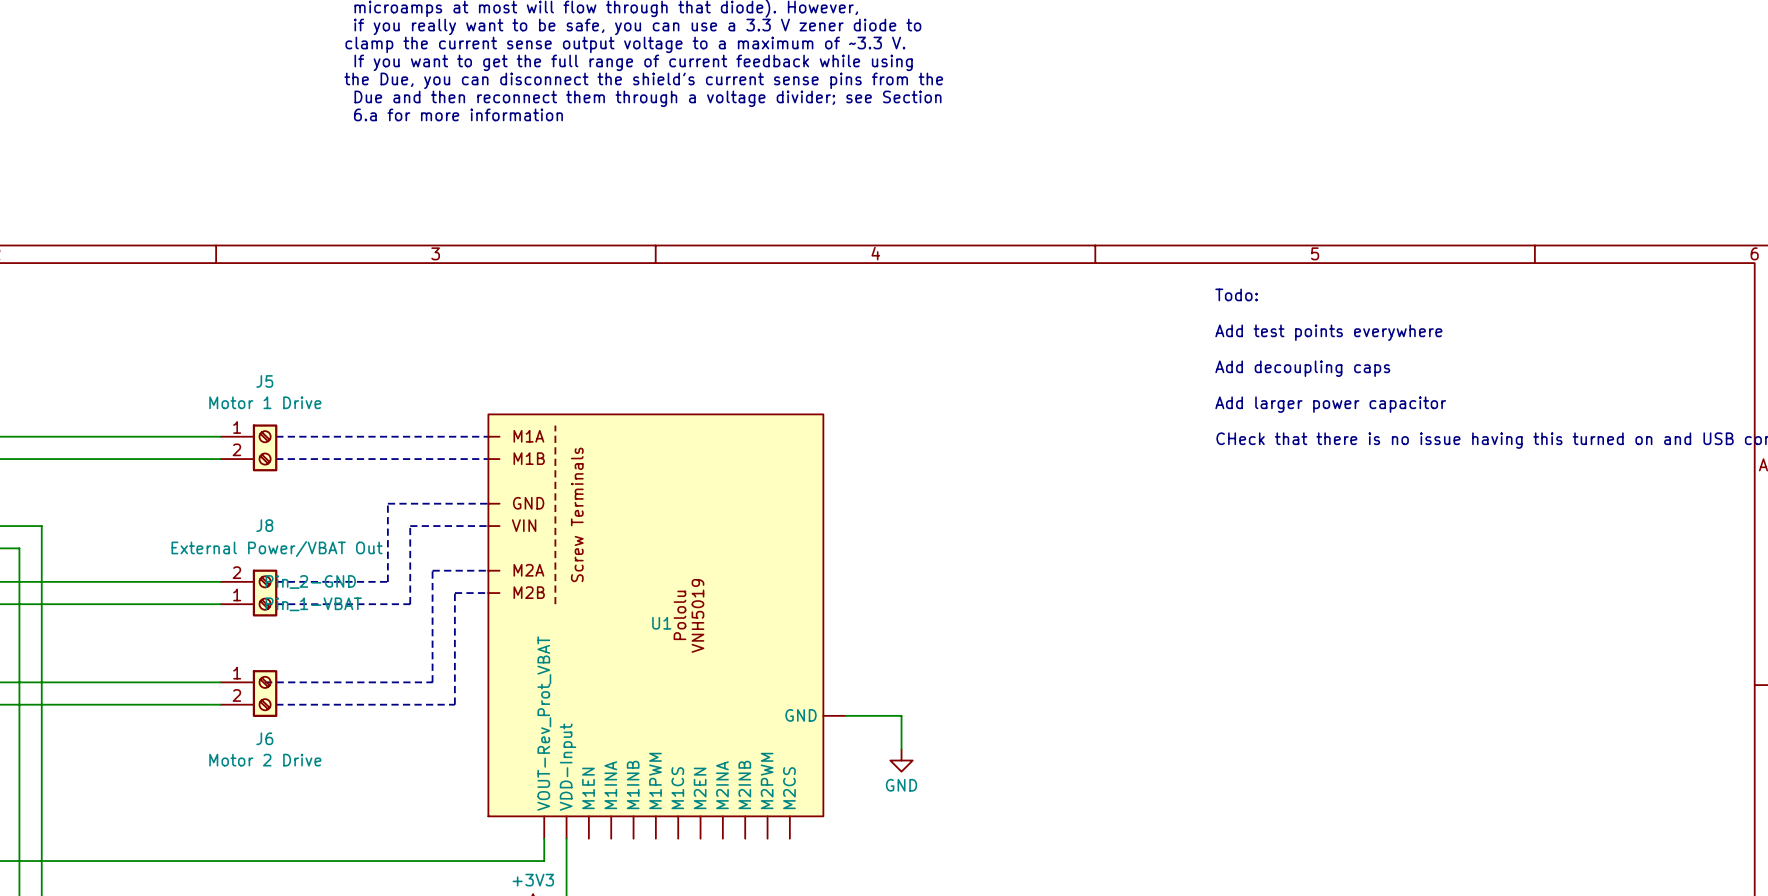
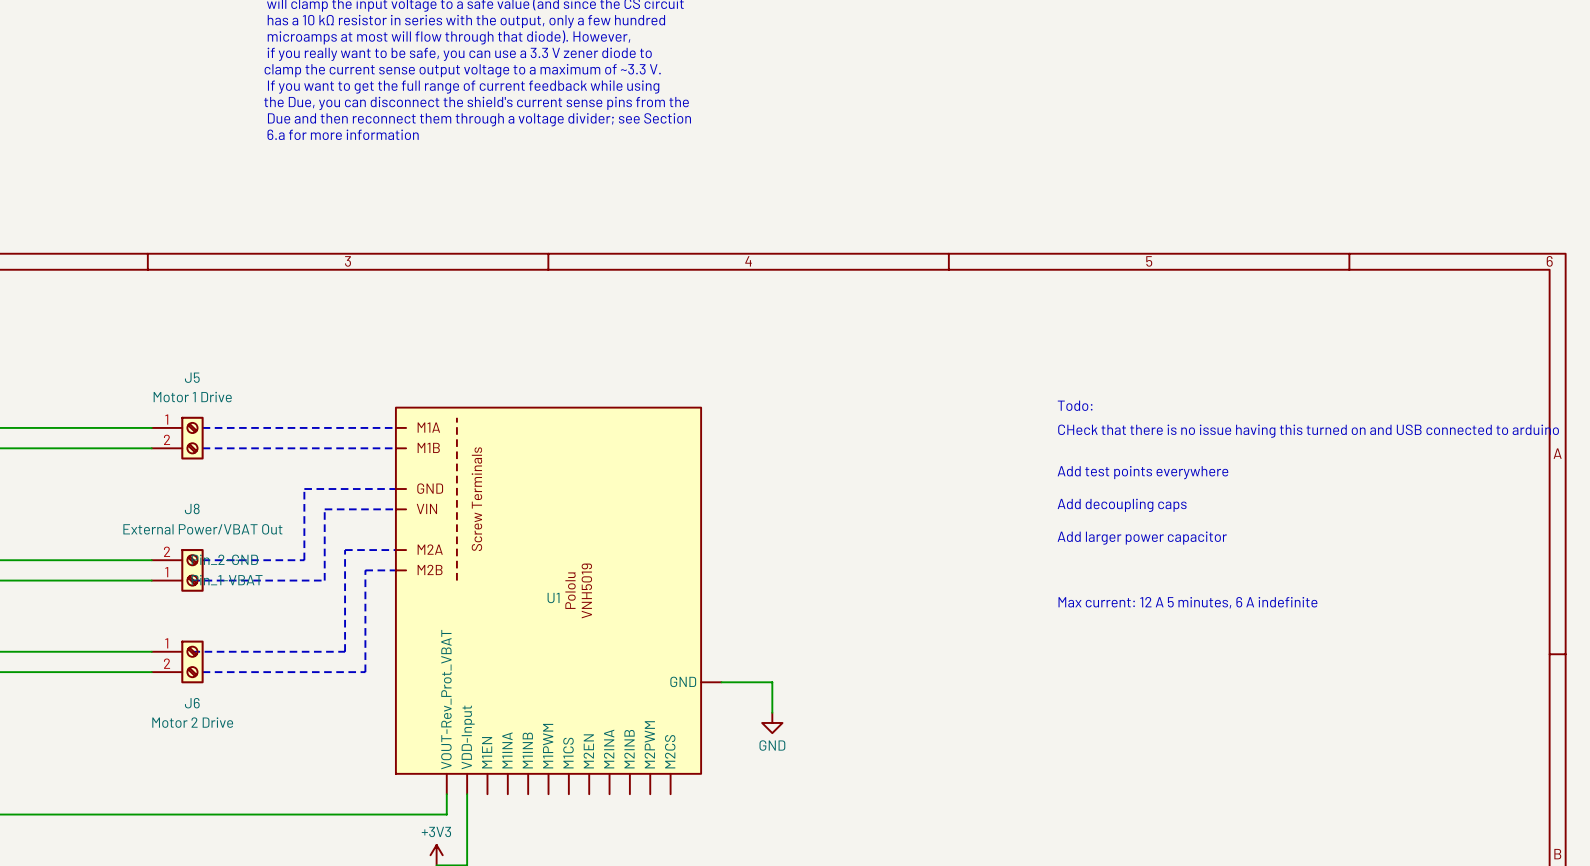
text position: Todo: (1236, 294) -> Todo: (1075, 405)
text position: Add test points everywhere (1328, 332) -> Add test points everywhere (1142, 472)
text position: Add decoupling caps (1302, 368) -> Add decoupling caps (1122, 505)
text position: Add larger power capacitor (1330, 404) -> Add larger power capacitor (1142, 538)
text: none -> Max current: 12 A 5 minutes, 6 A indefinite (1187, 602)

